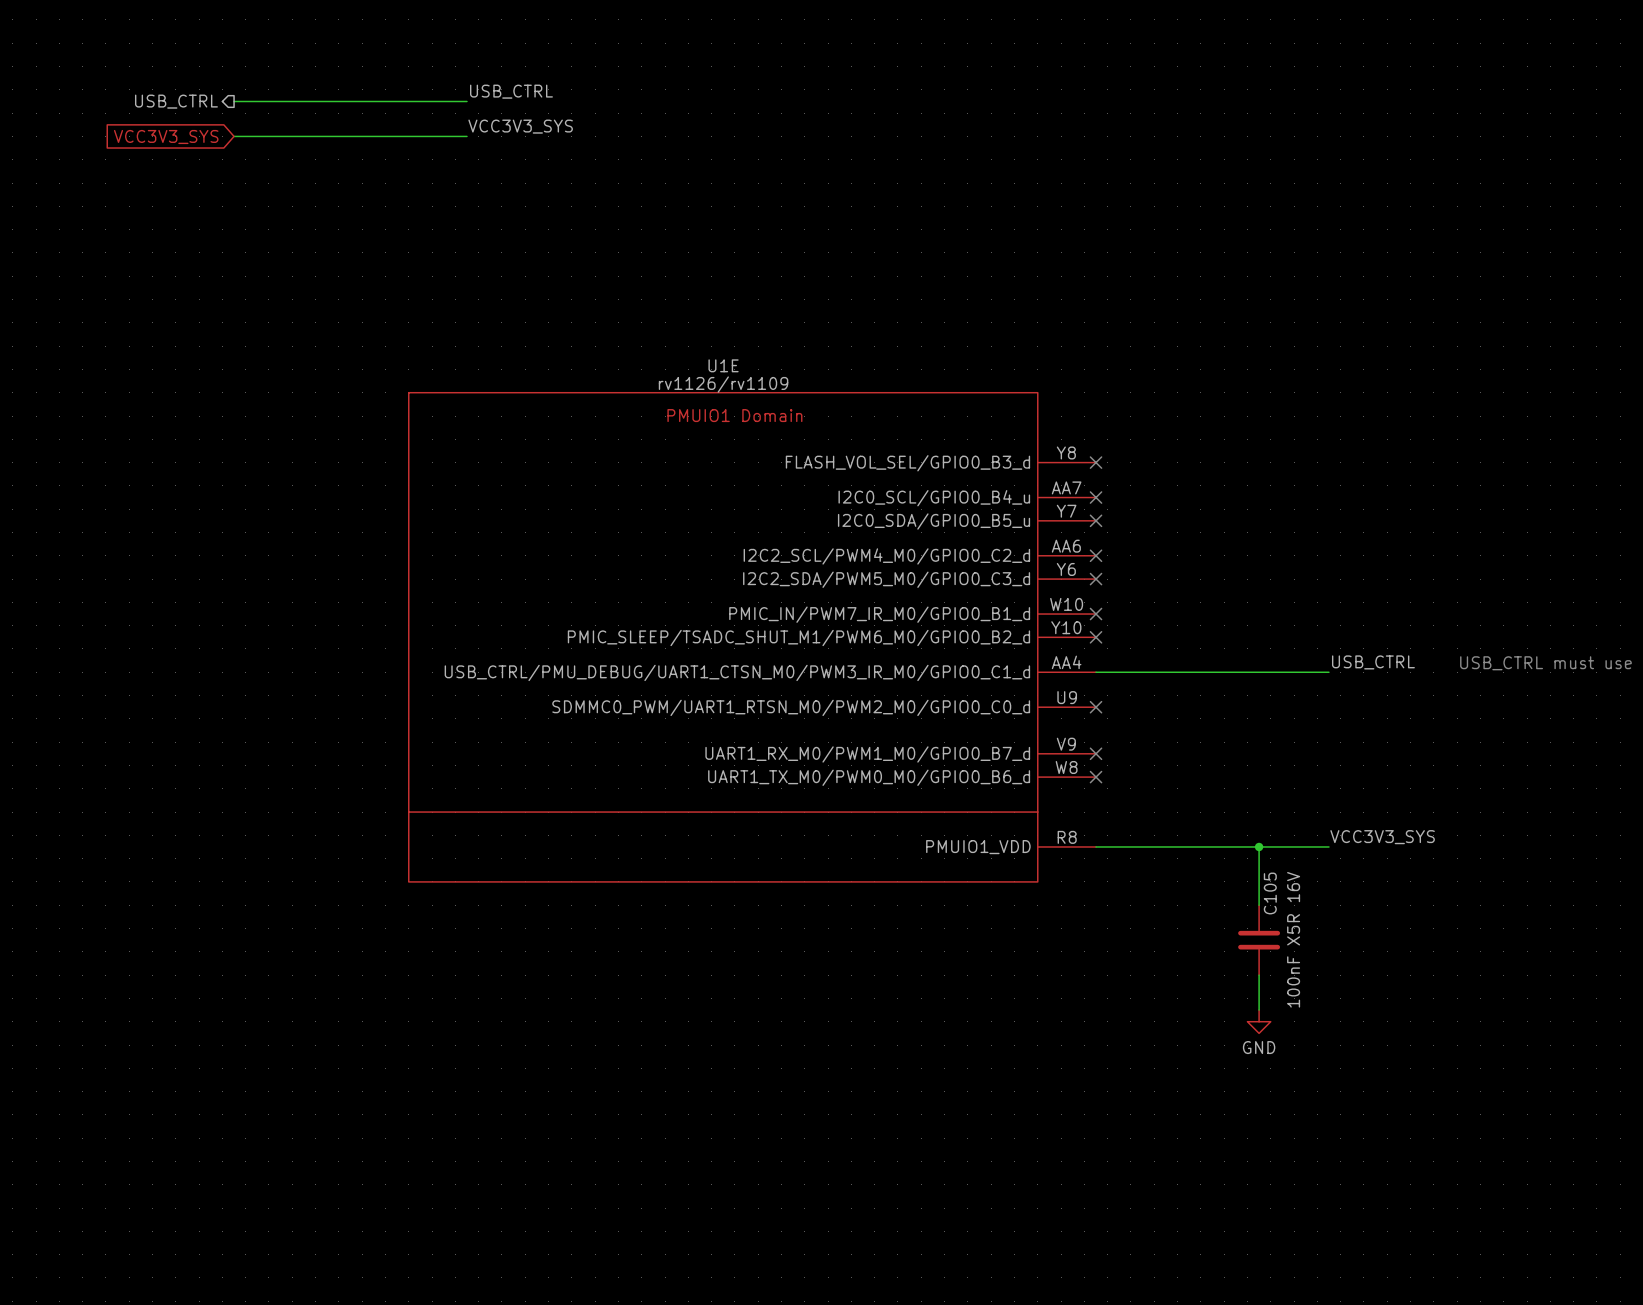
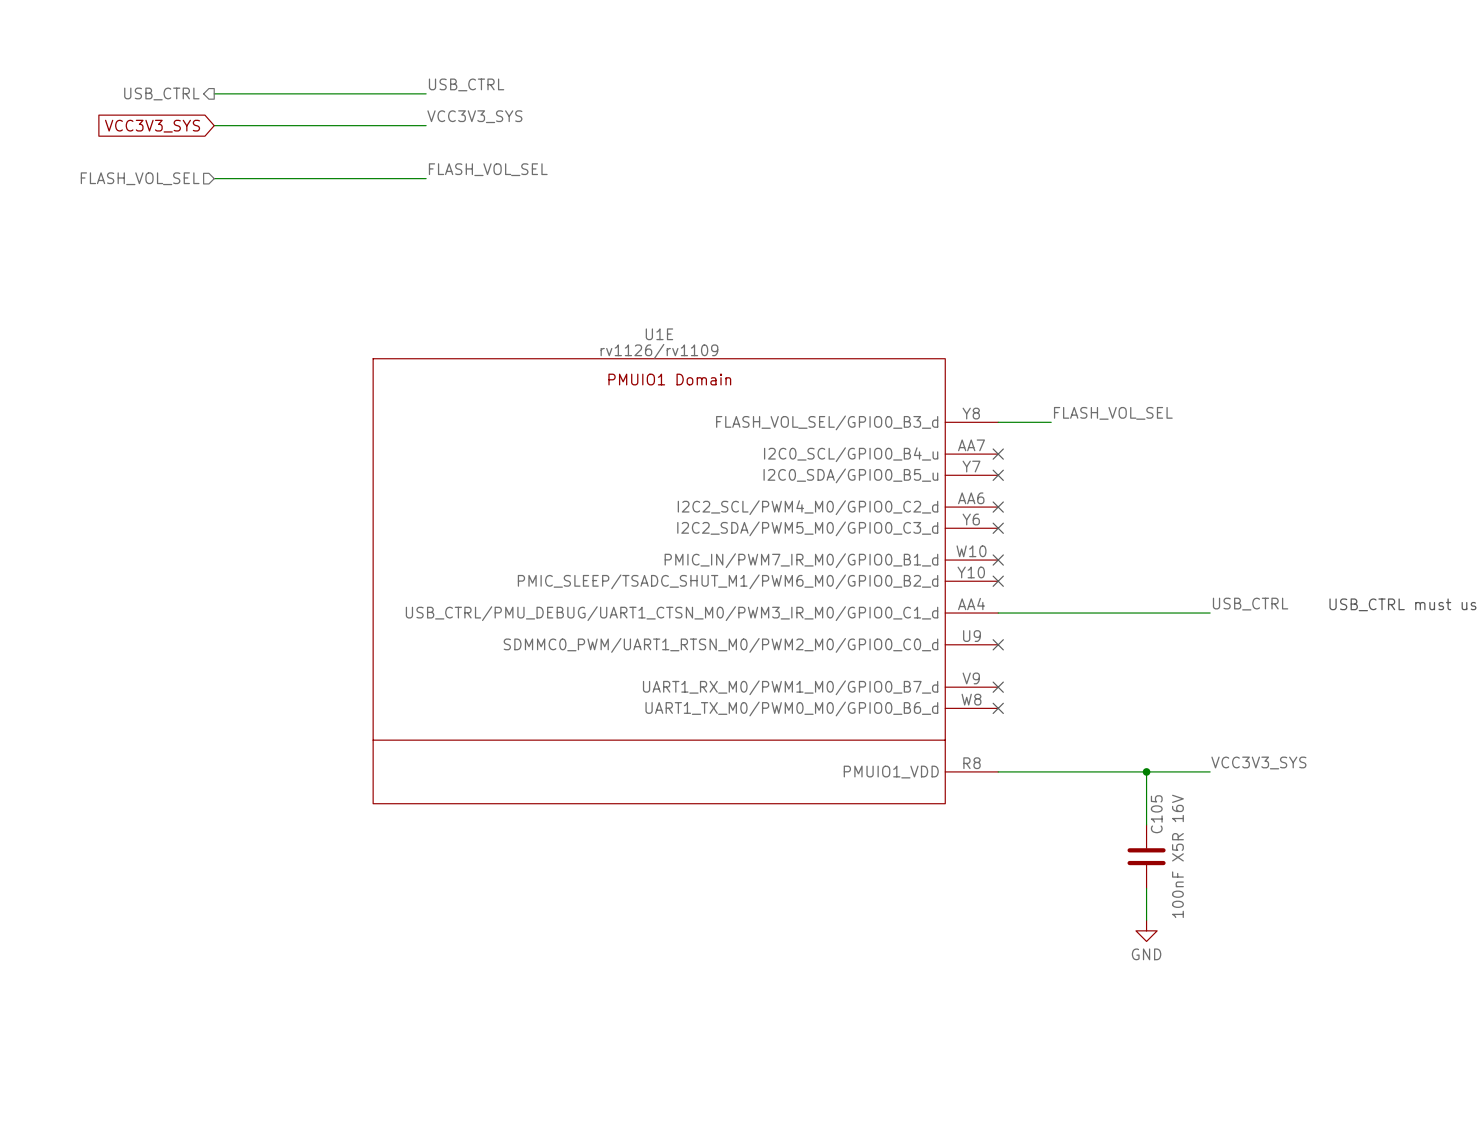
label: none -> FLASH_VOL_SEL (488, 169)
hierarchical label: none -> FLASH_VOL_SEL (140, 178)
wire: none -> (214, 178) (426, 178)
label: none -> FLASH_VOL_SEL (1113, 413)
wire: none -> (998, 422) (1051, 422)
no-connect mark: (1096, 462) -> none

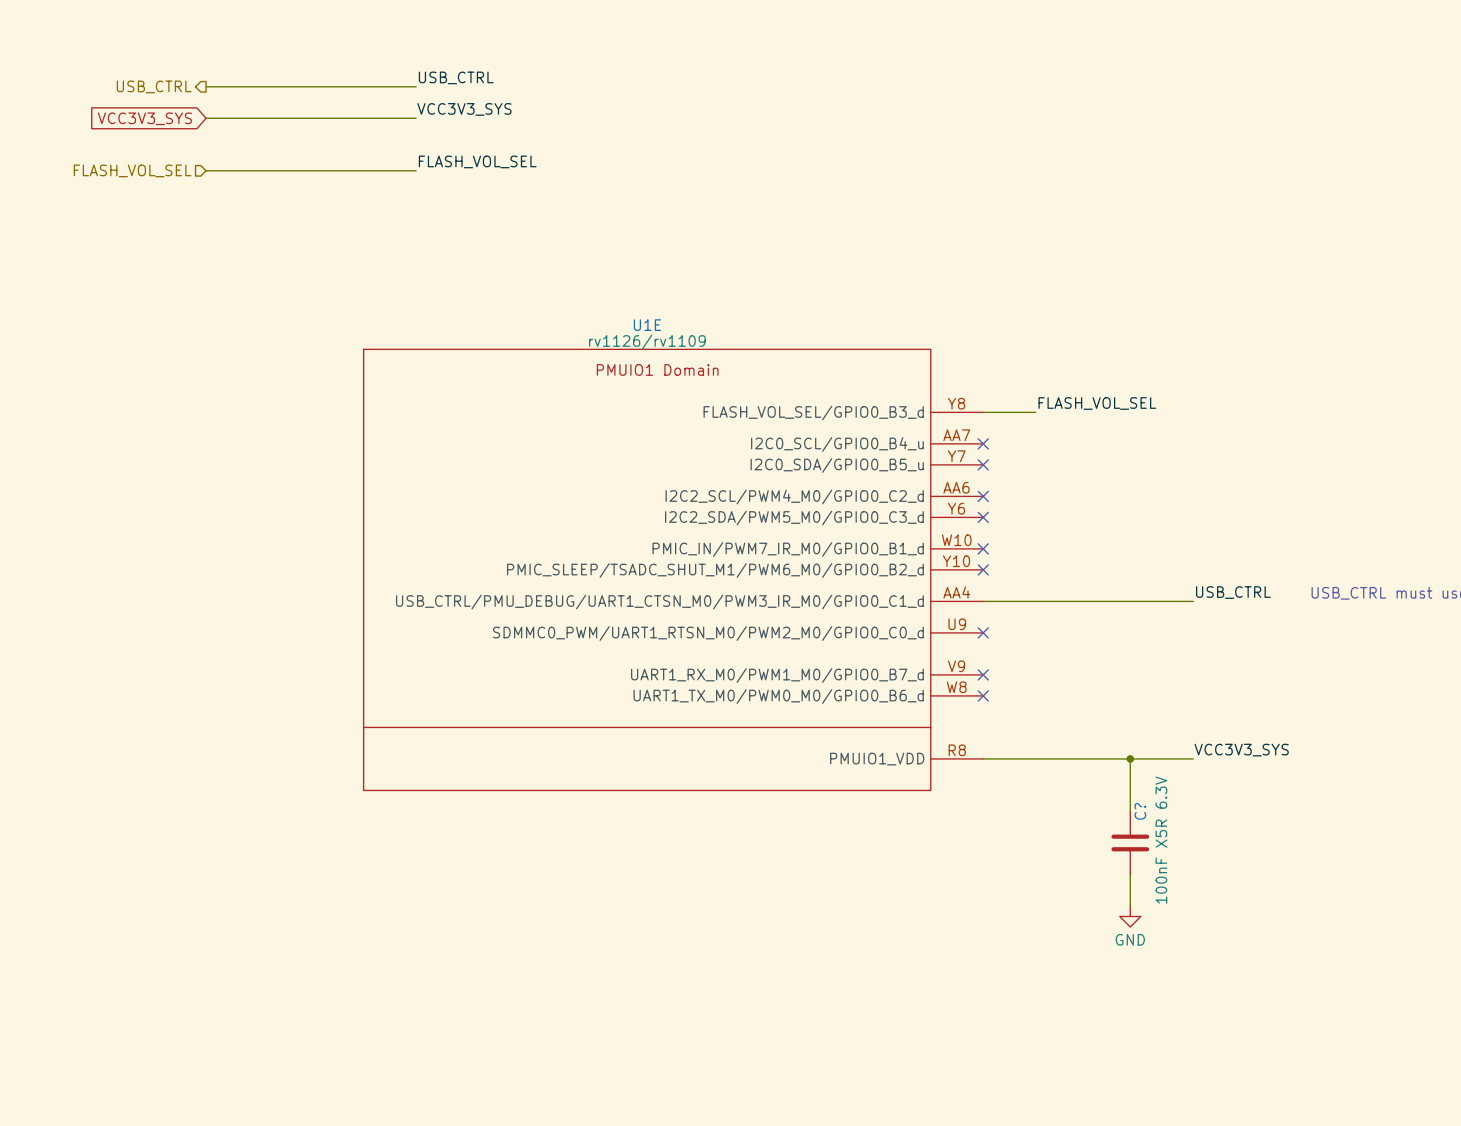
C105 name: C105 (1156, 814) -> C? (1140, 811)
C105 value: 100nF X5R 16V (1177, 856) -> 100nF X5R 6.3V (1161, 840)

